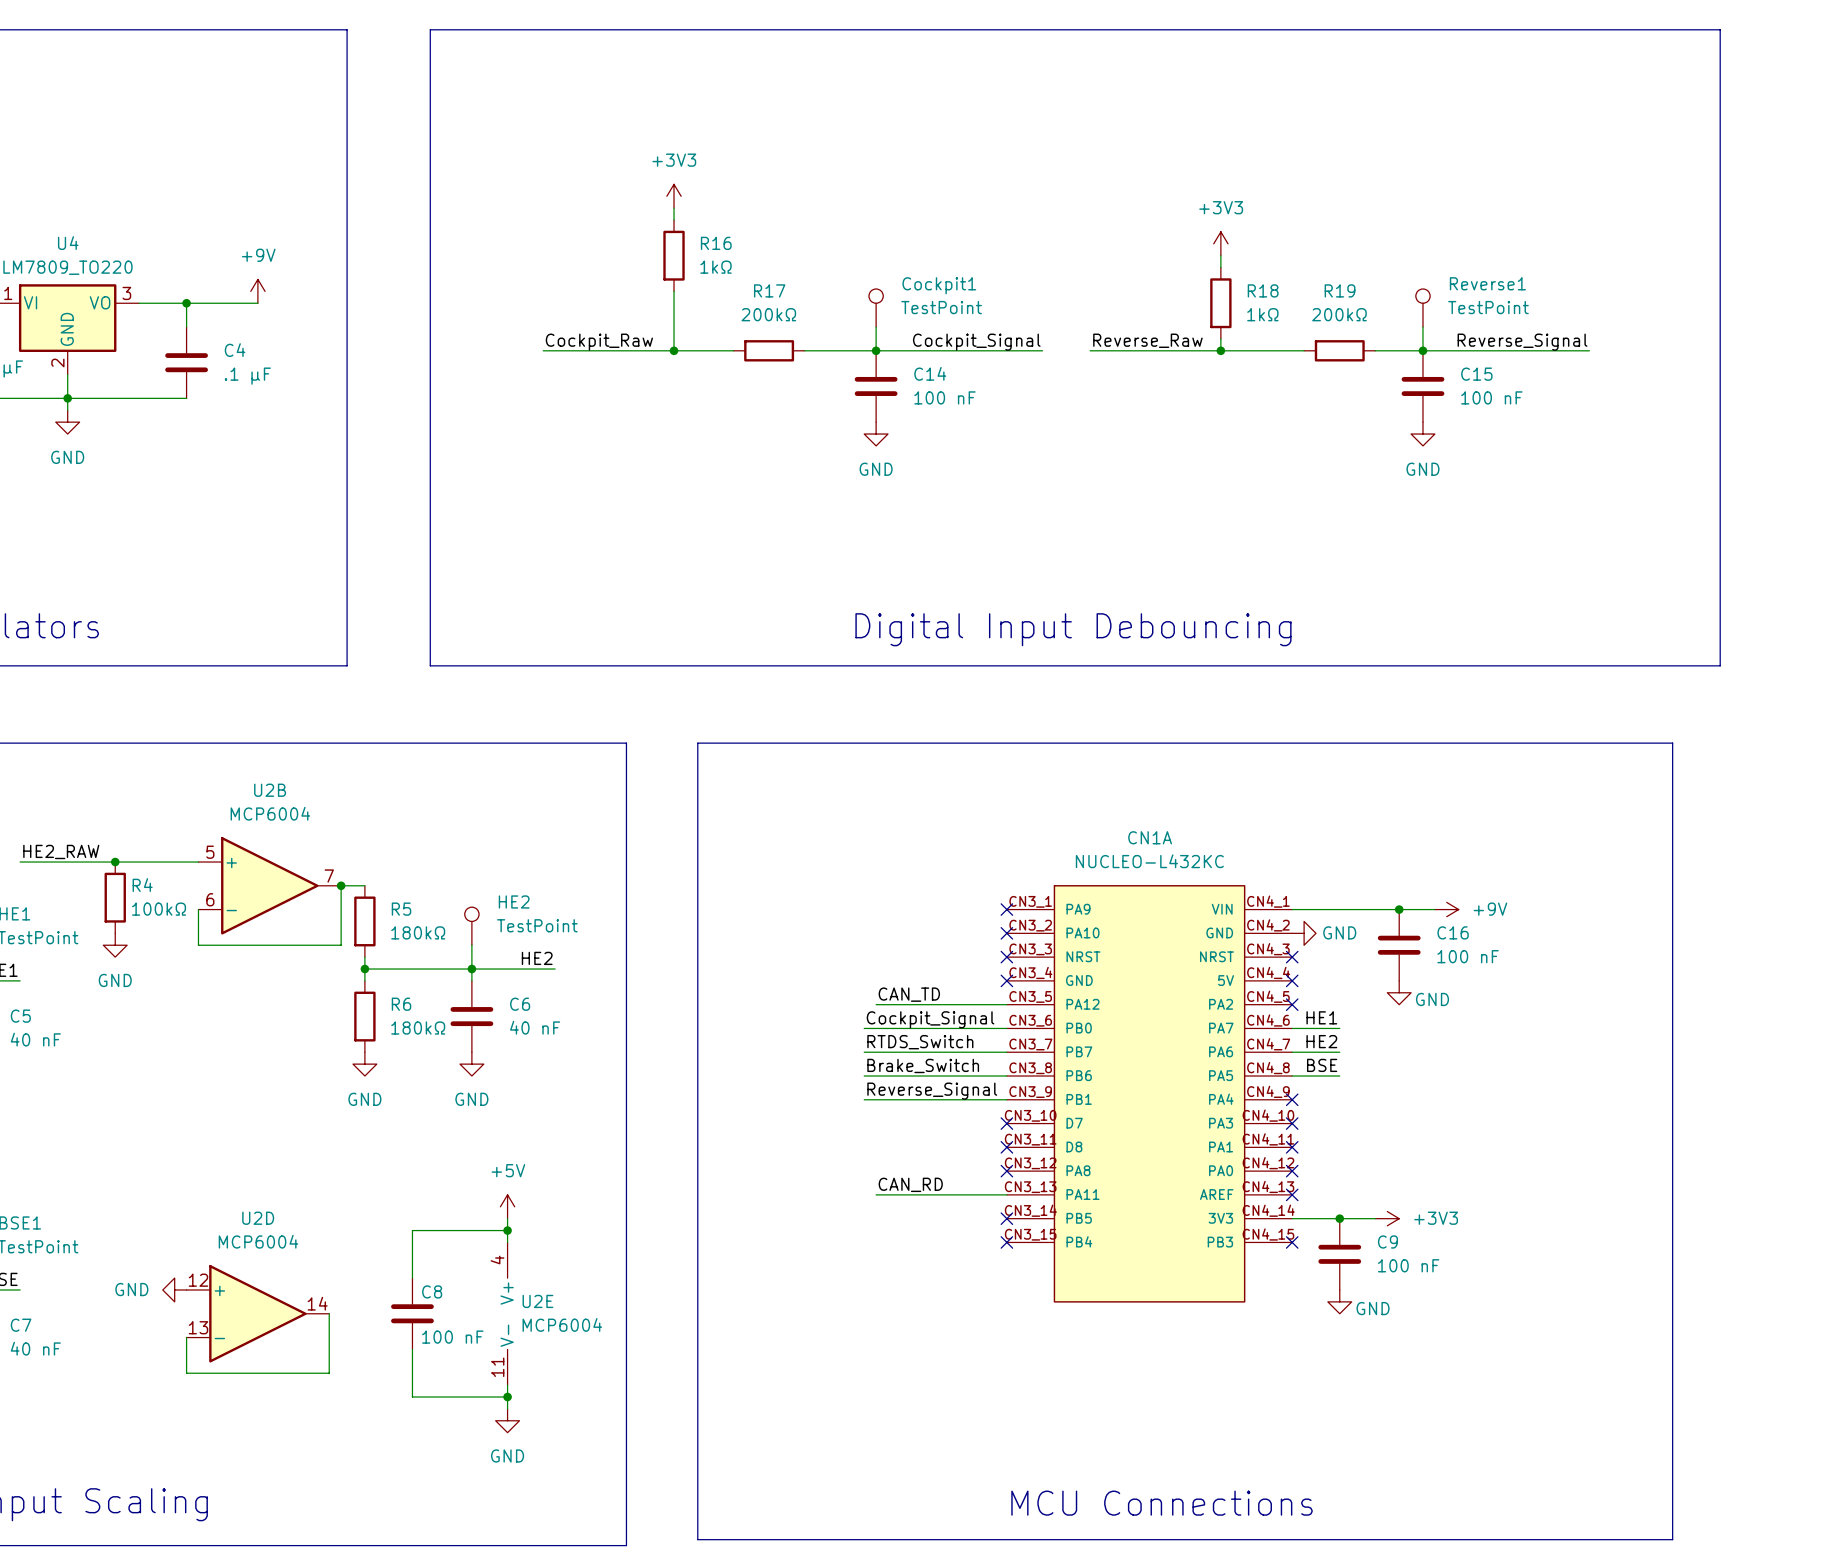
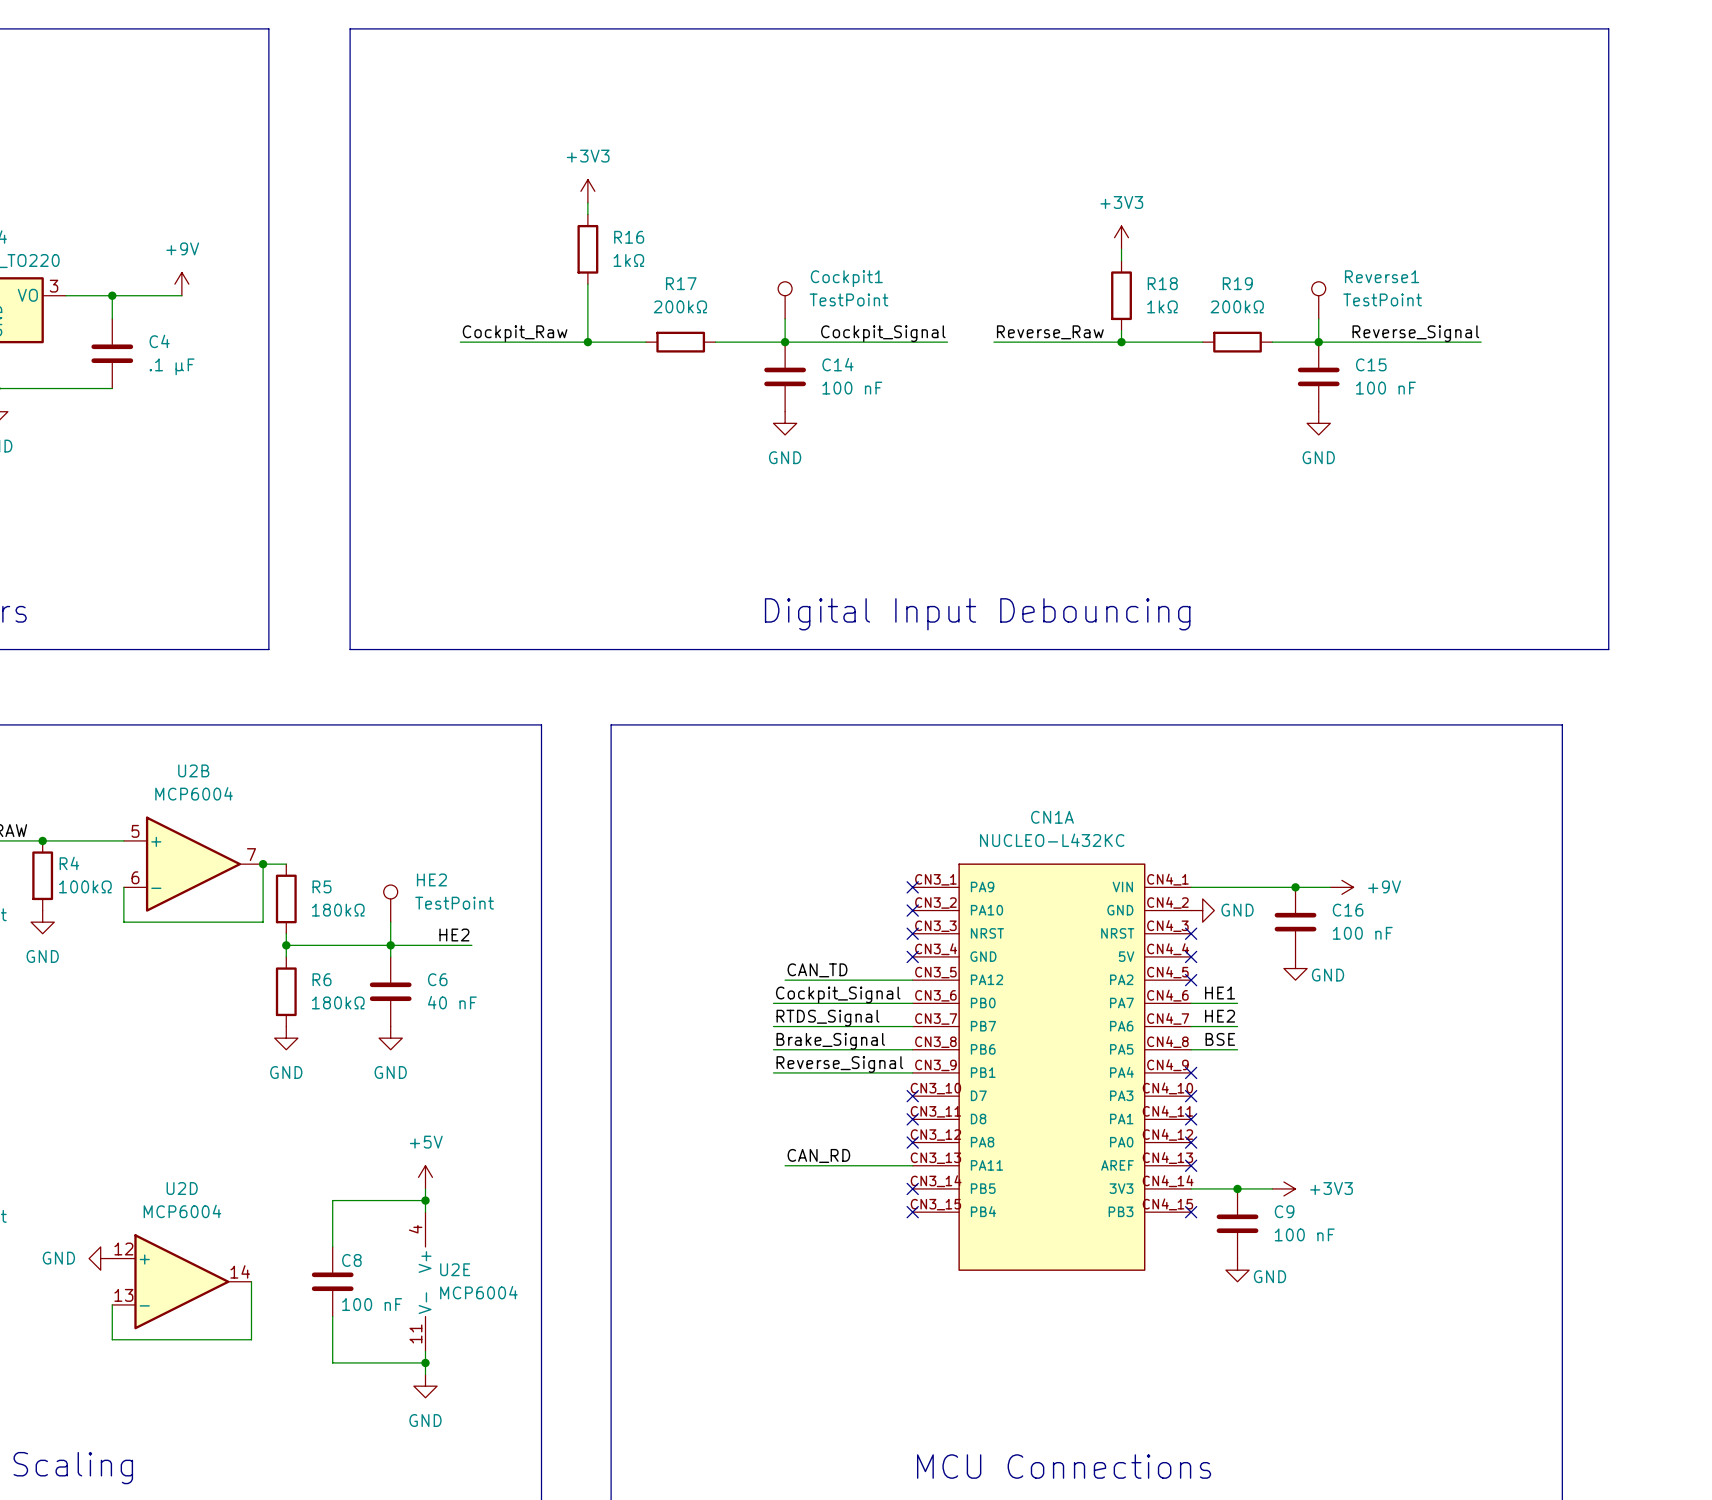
label: RTDS_Switch (920, 1042) -> RTDS_Signal (828, 1018)
label: Brake_Switch (923, 1065) -> Brake_Signal (830, 1041)

